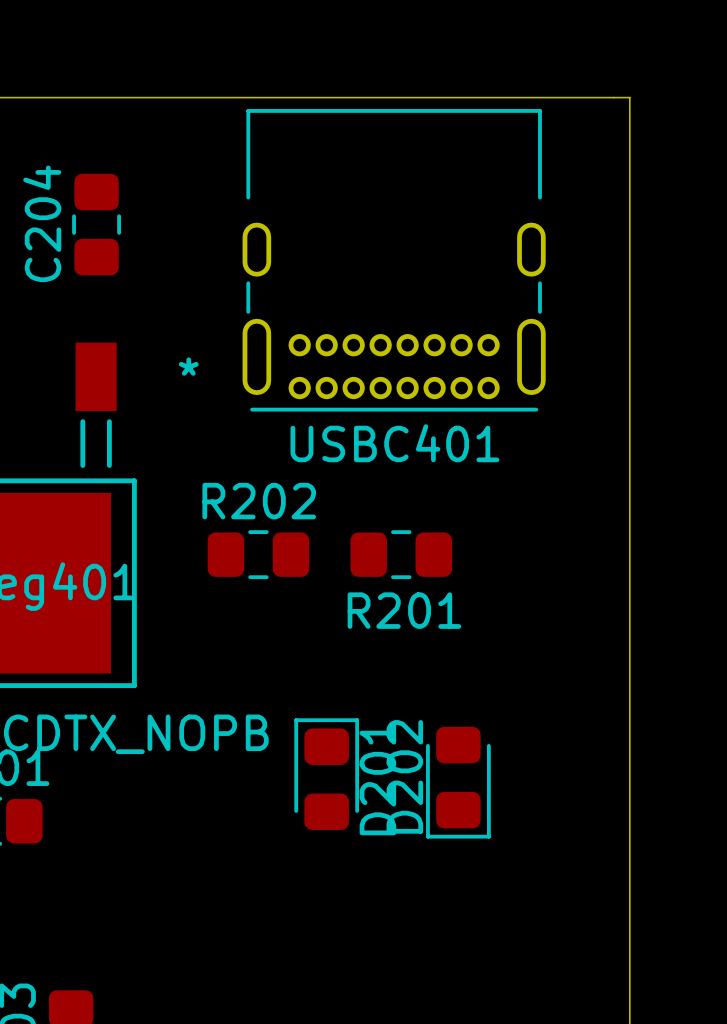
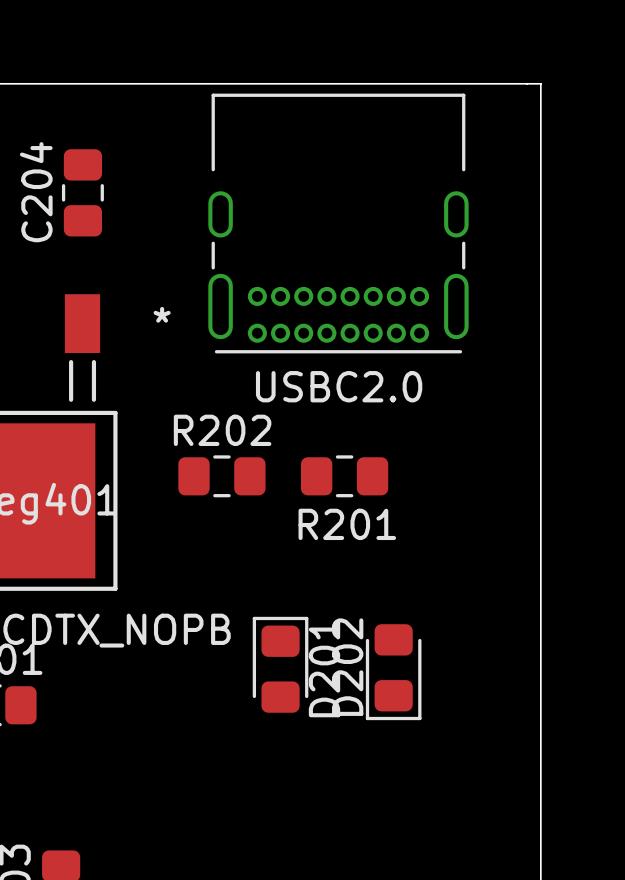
USBC401 name: USBC401 (394, 443) -> USBC2.0 (339, 386)

